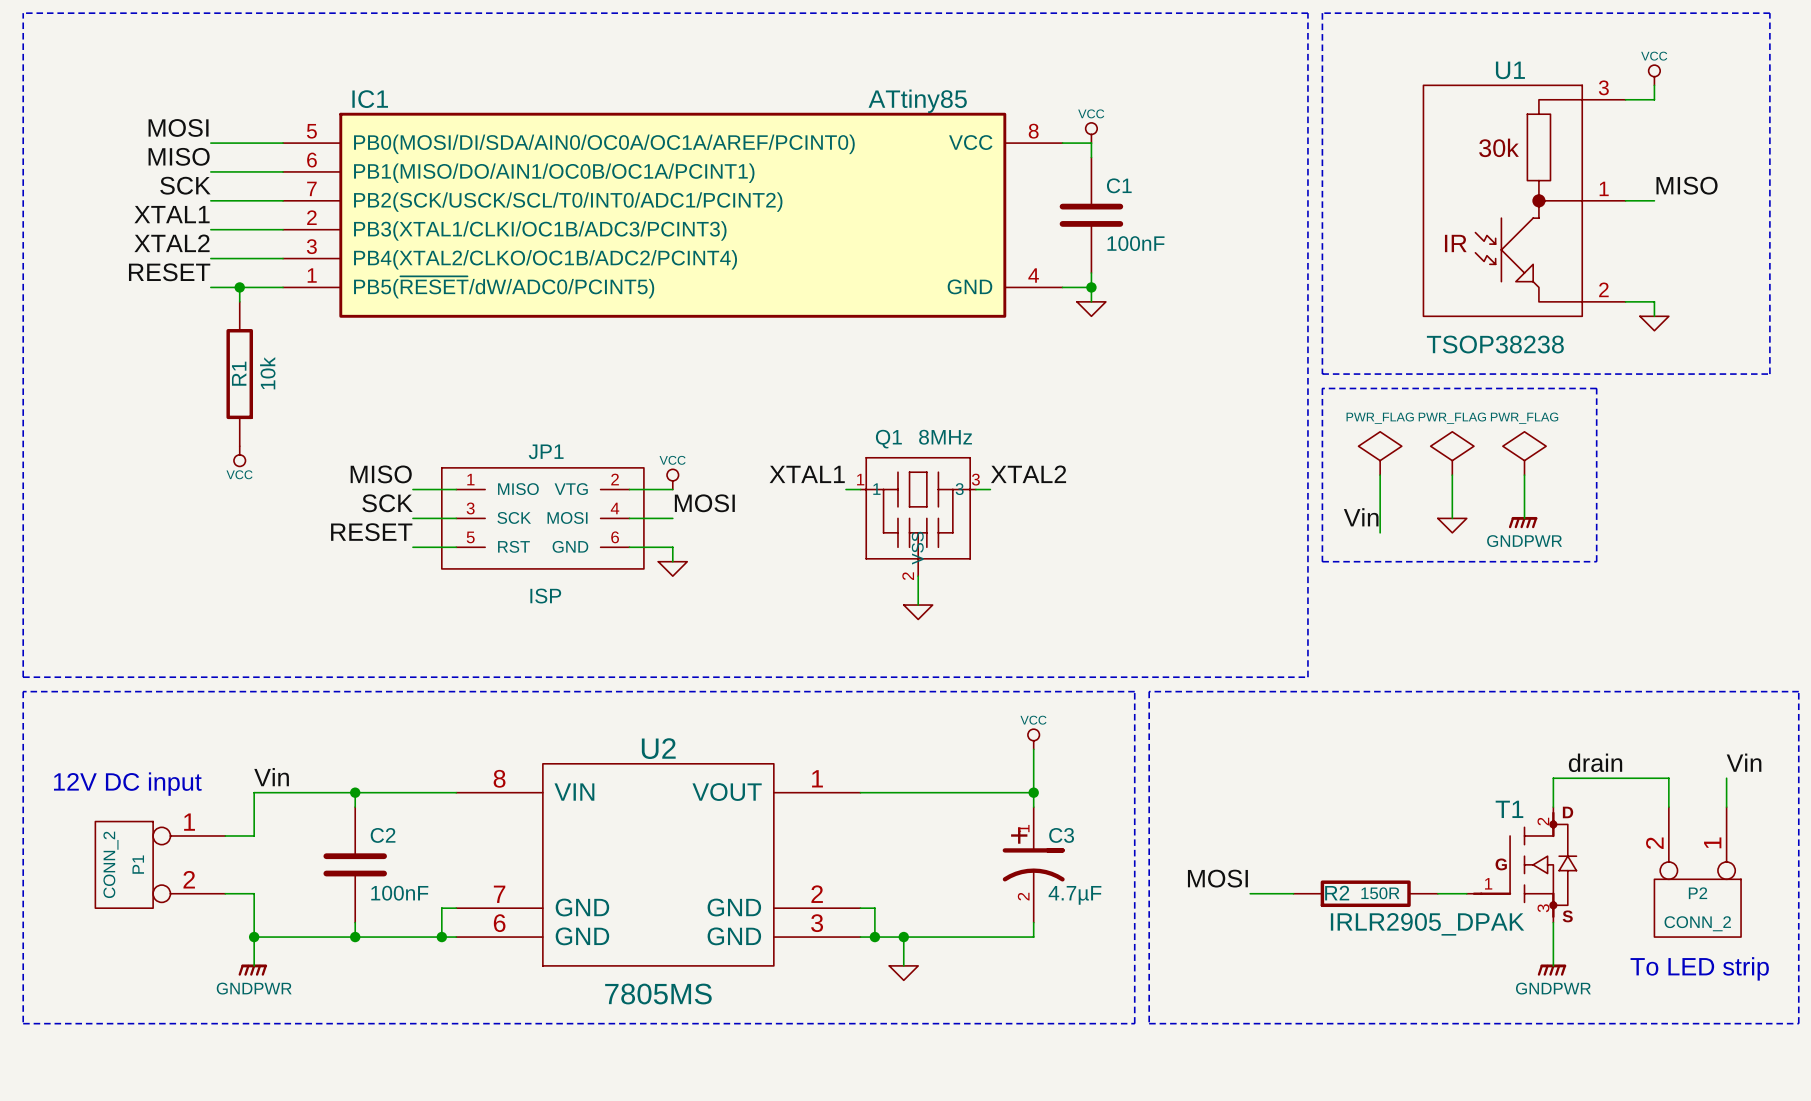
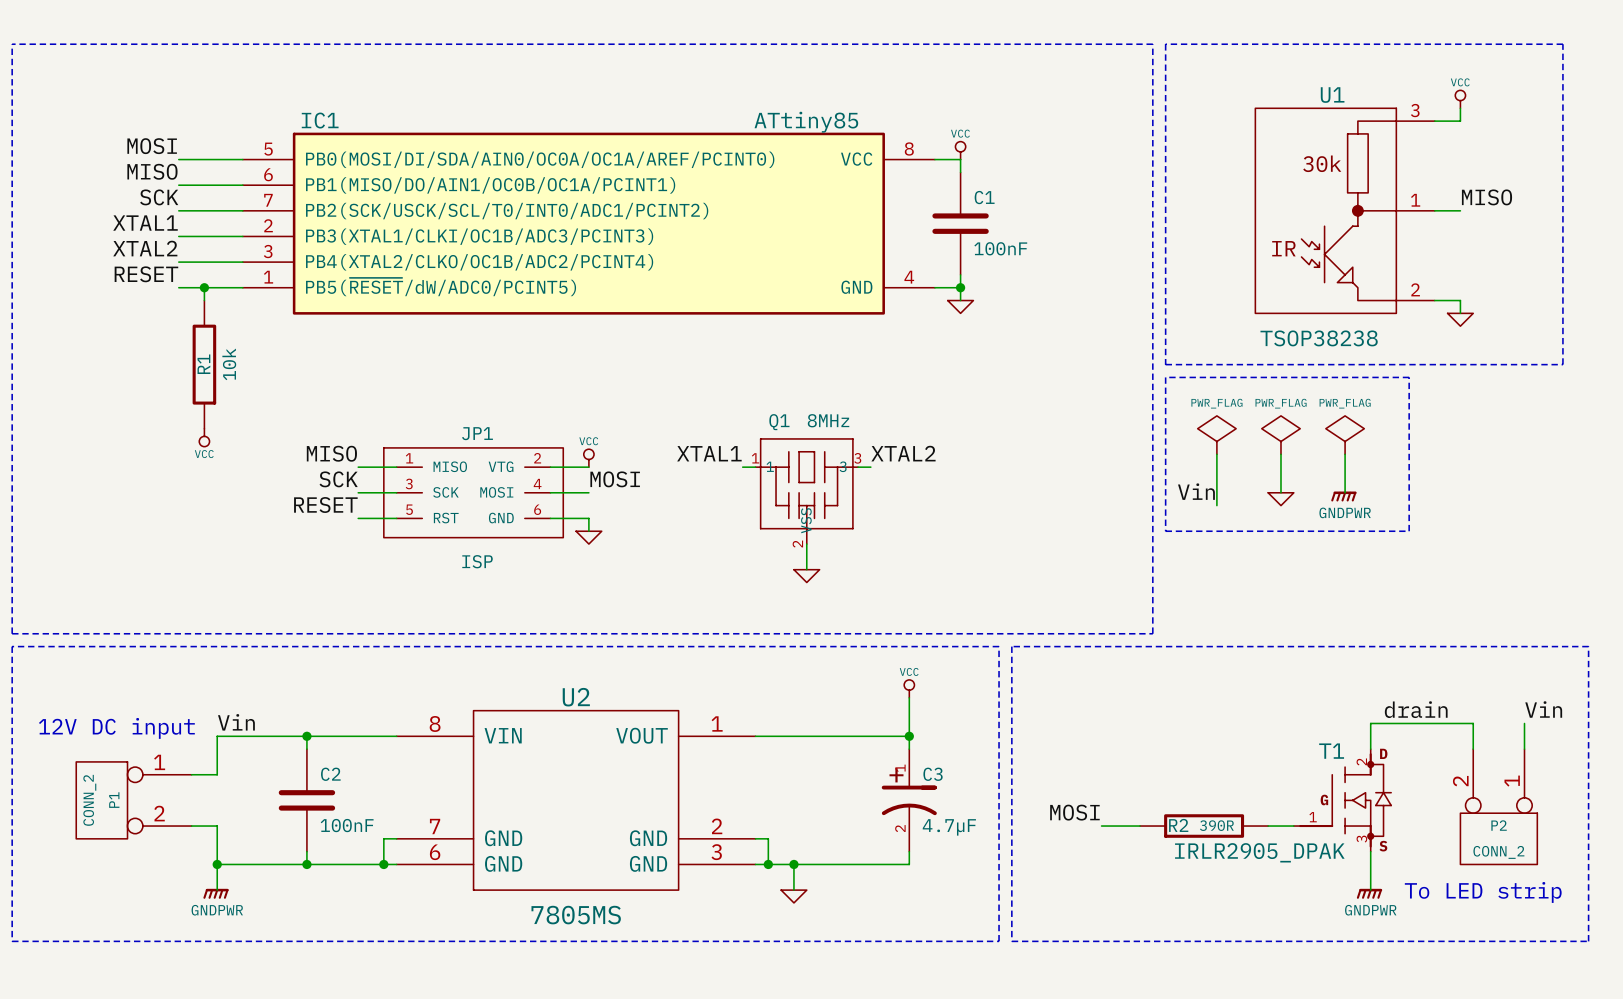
R2 value: 150R (1380, 893) -> 390R (1216, 825)

